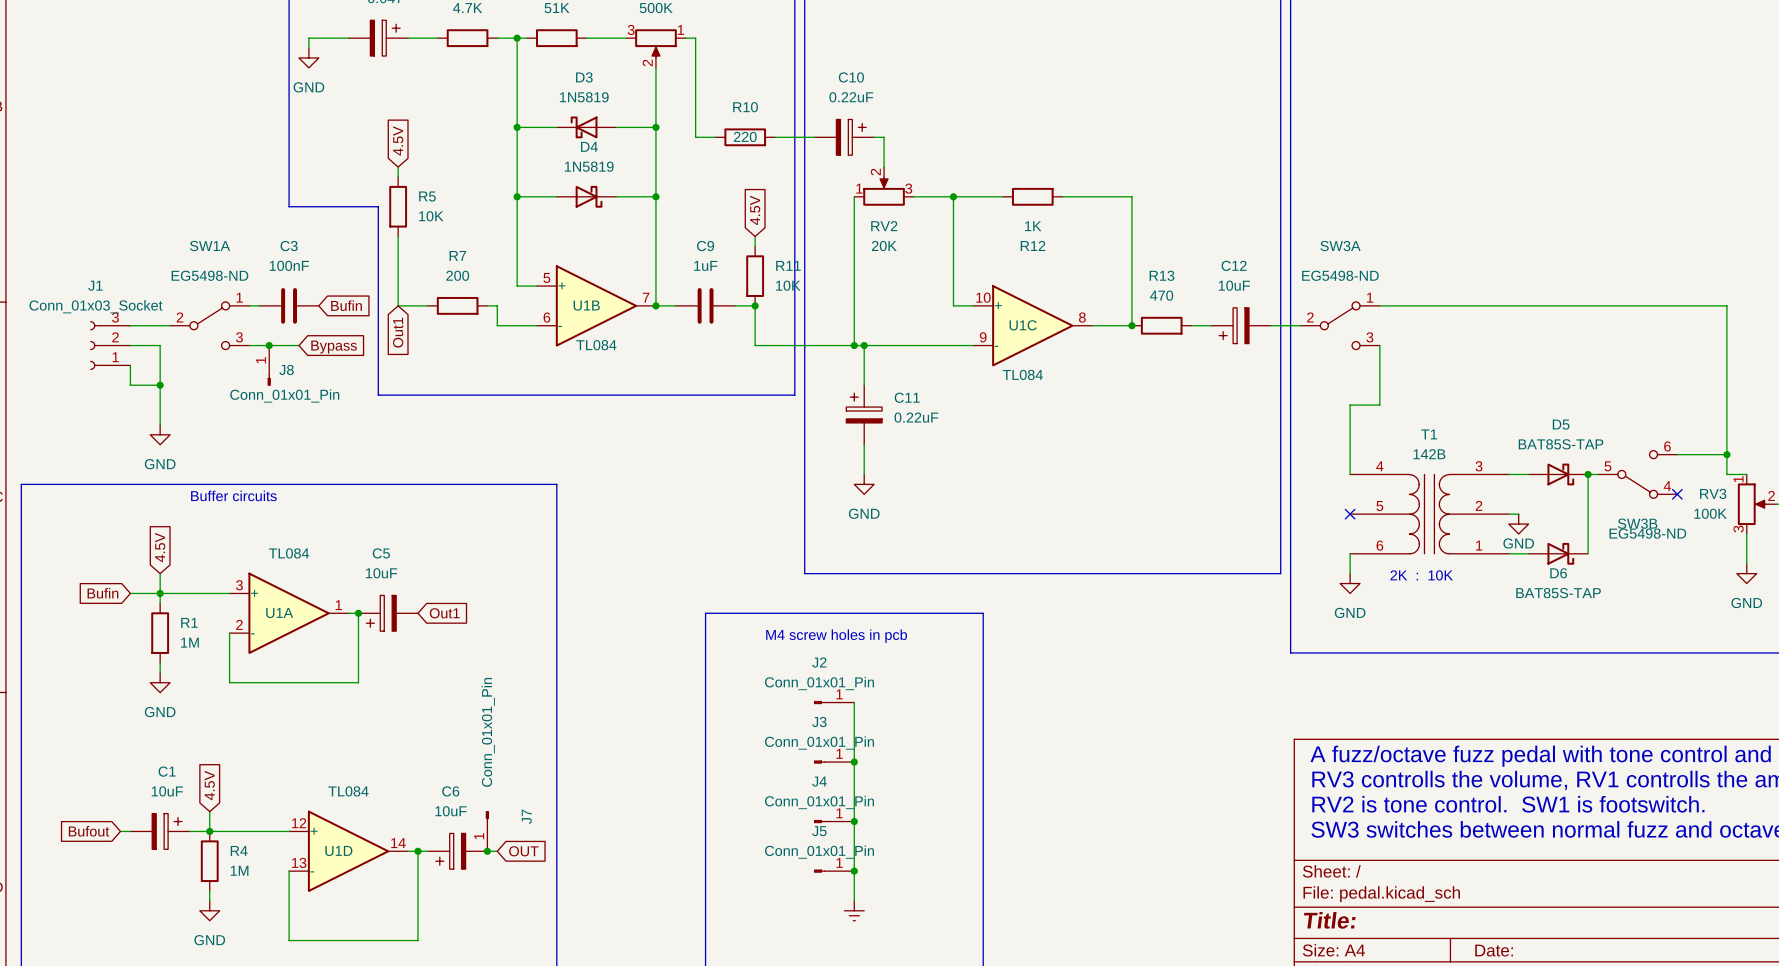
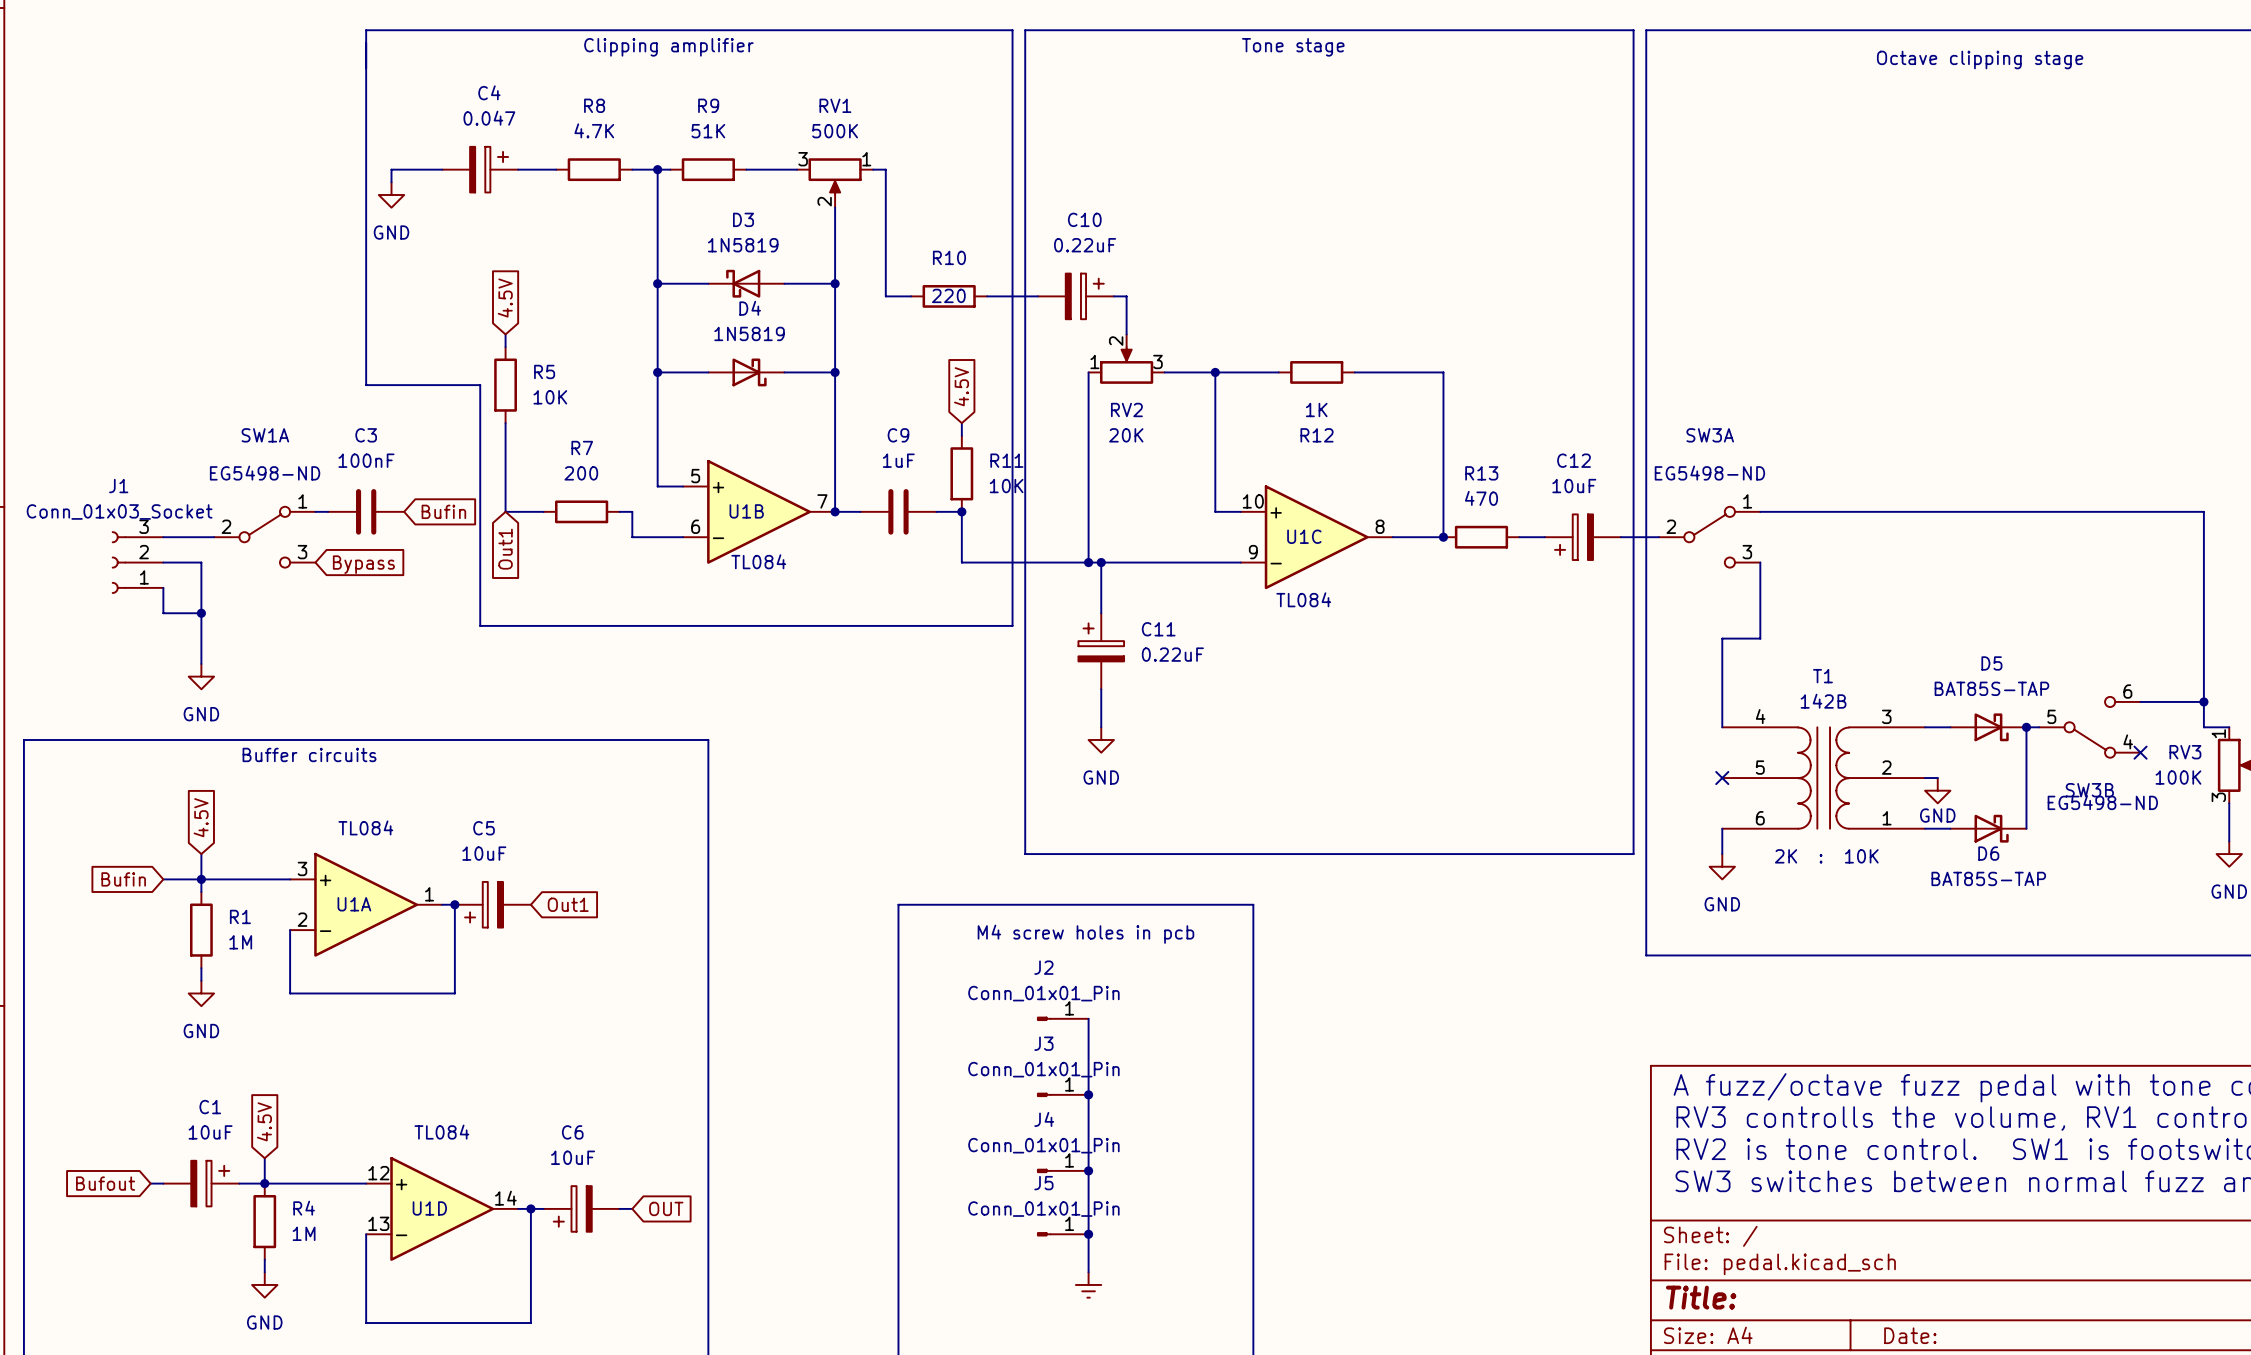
wire: (249, 345) (298, 345) -> none
junction: (269, 345) -> none
global label position: Bypass (334, 347) -> Bypass (363, 564)
J8: Conn_01x01_Pin (269, 365) -> none
J7: Conn_01x01_Pin (487, 831) -> none
junction: (487, 851) -> none

